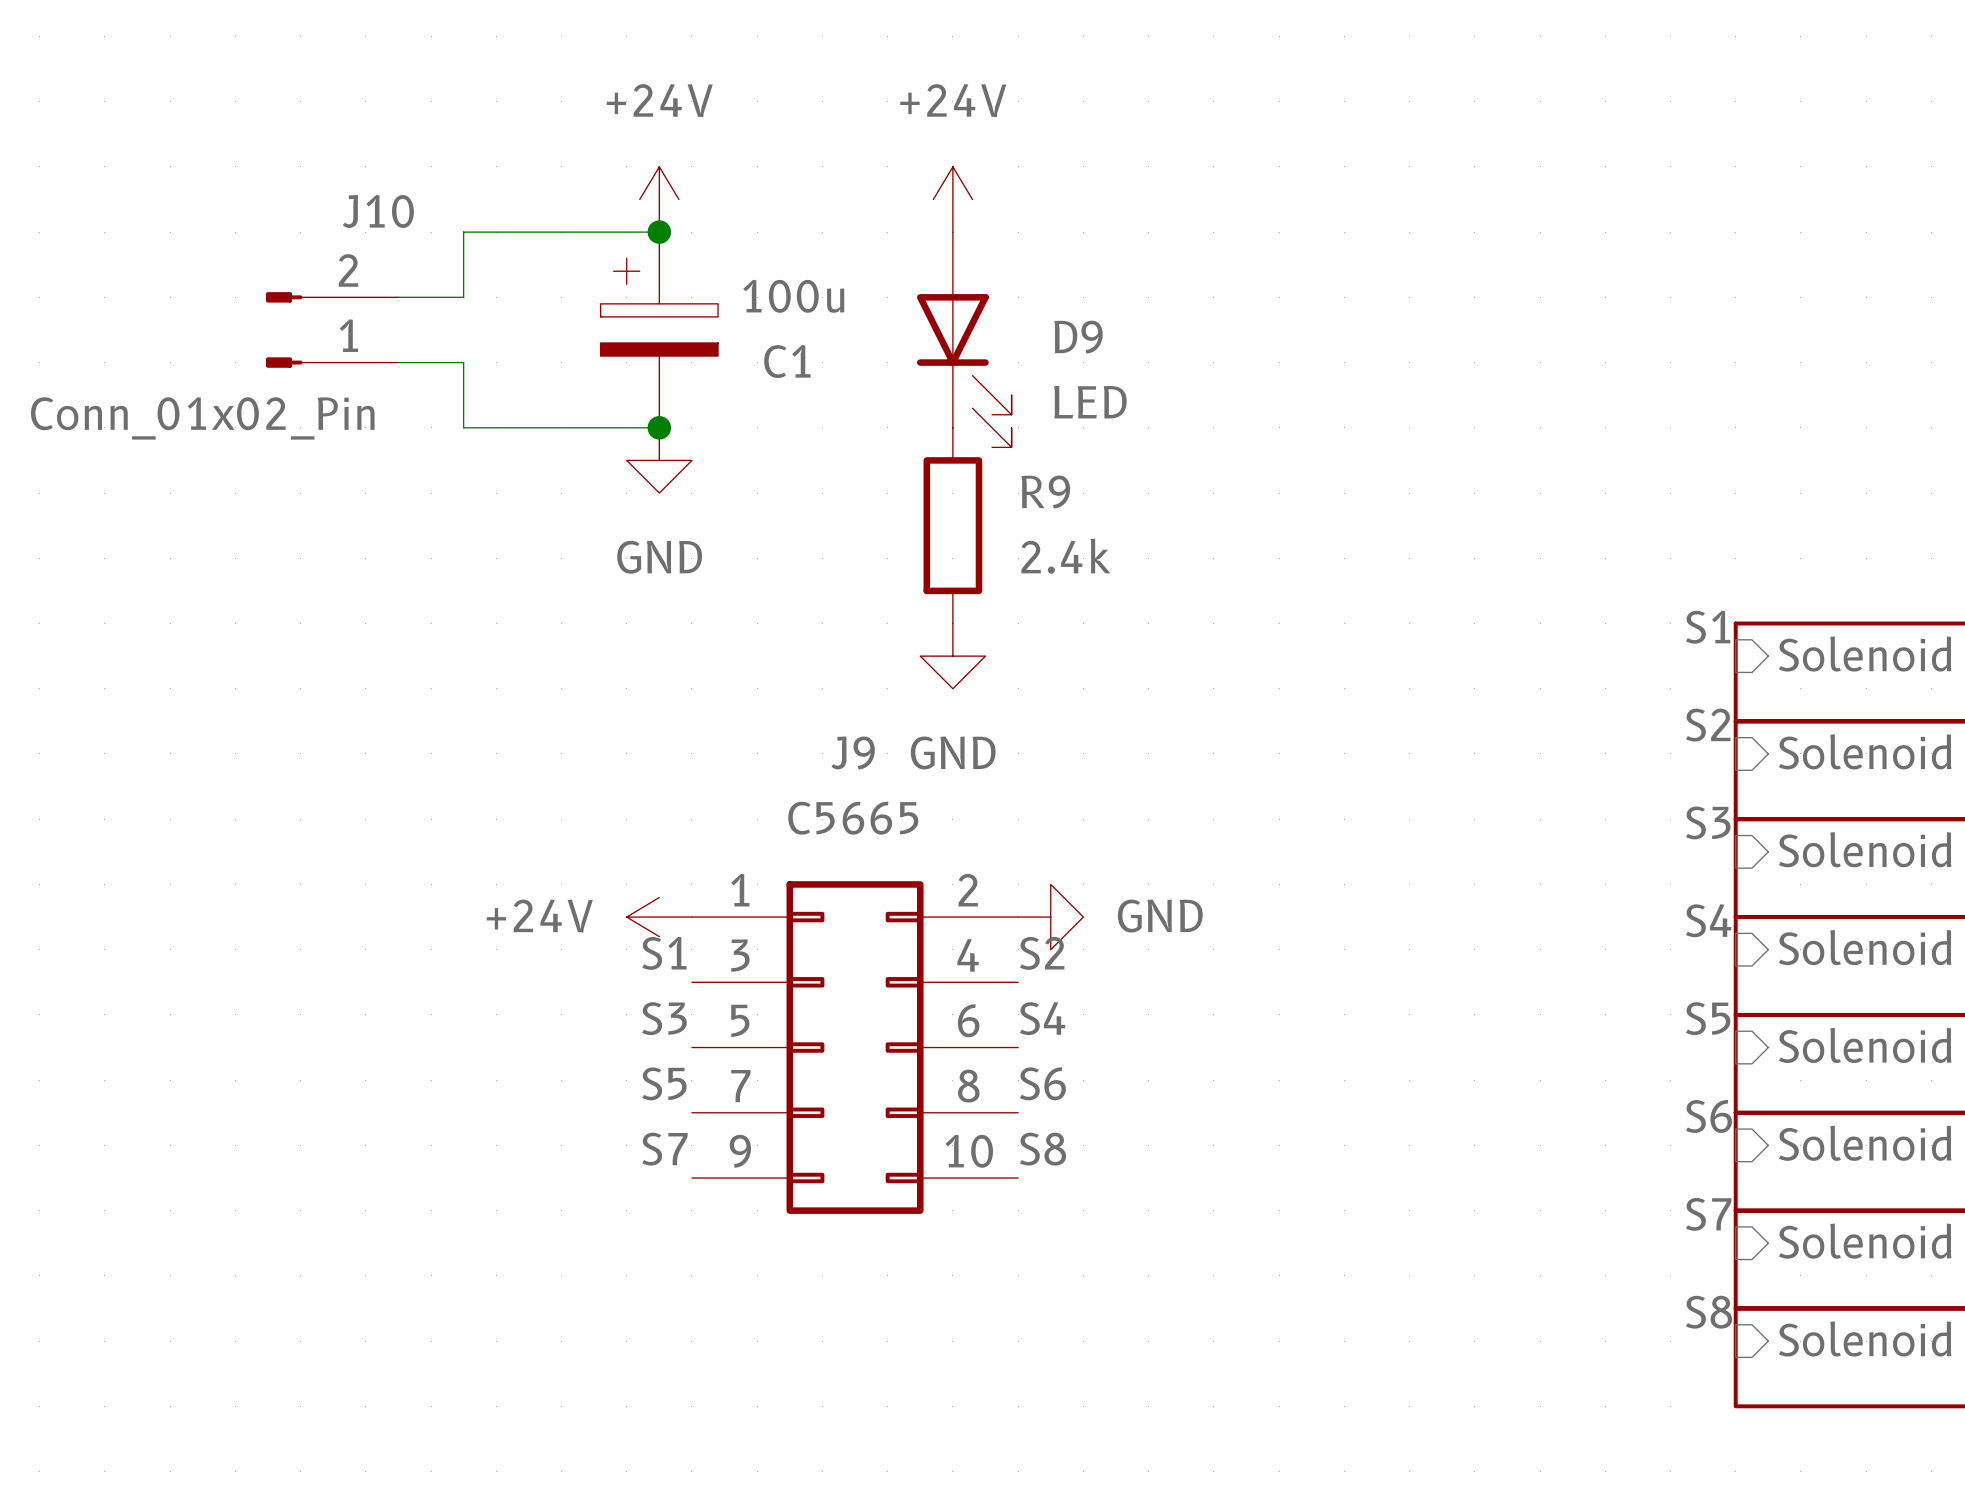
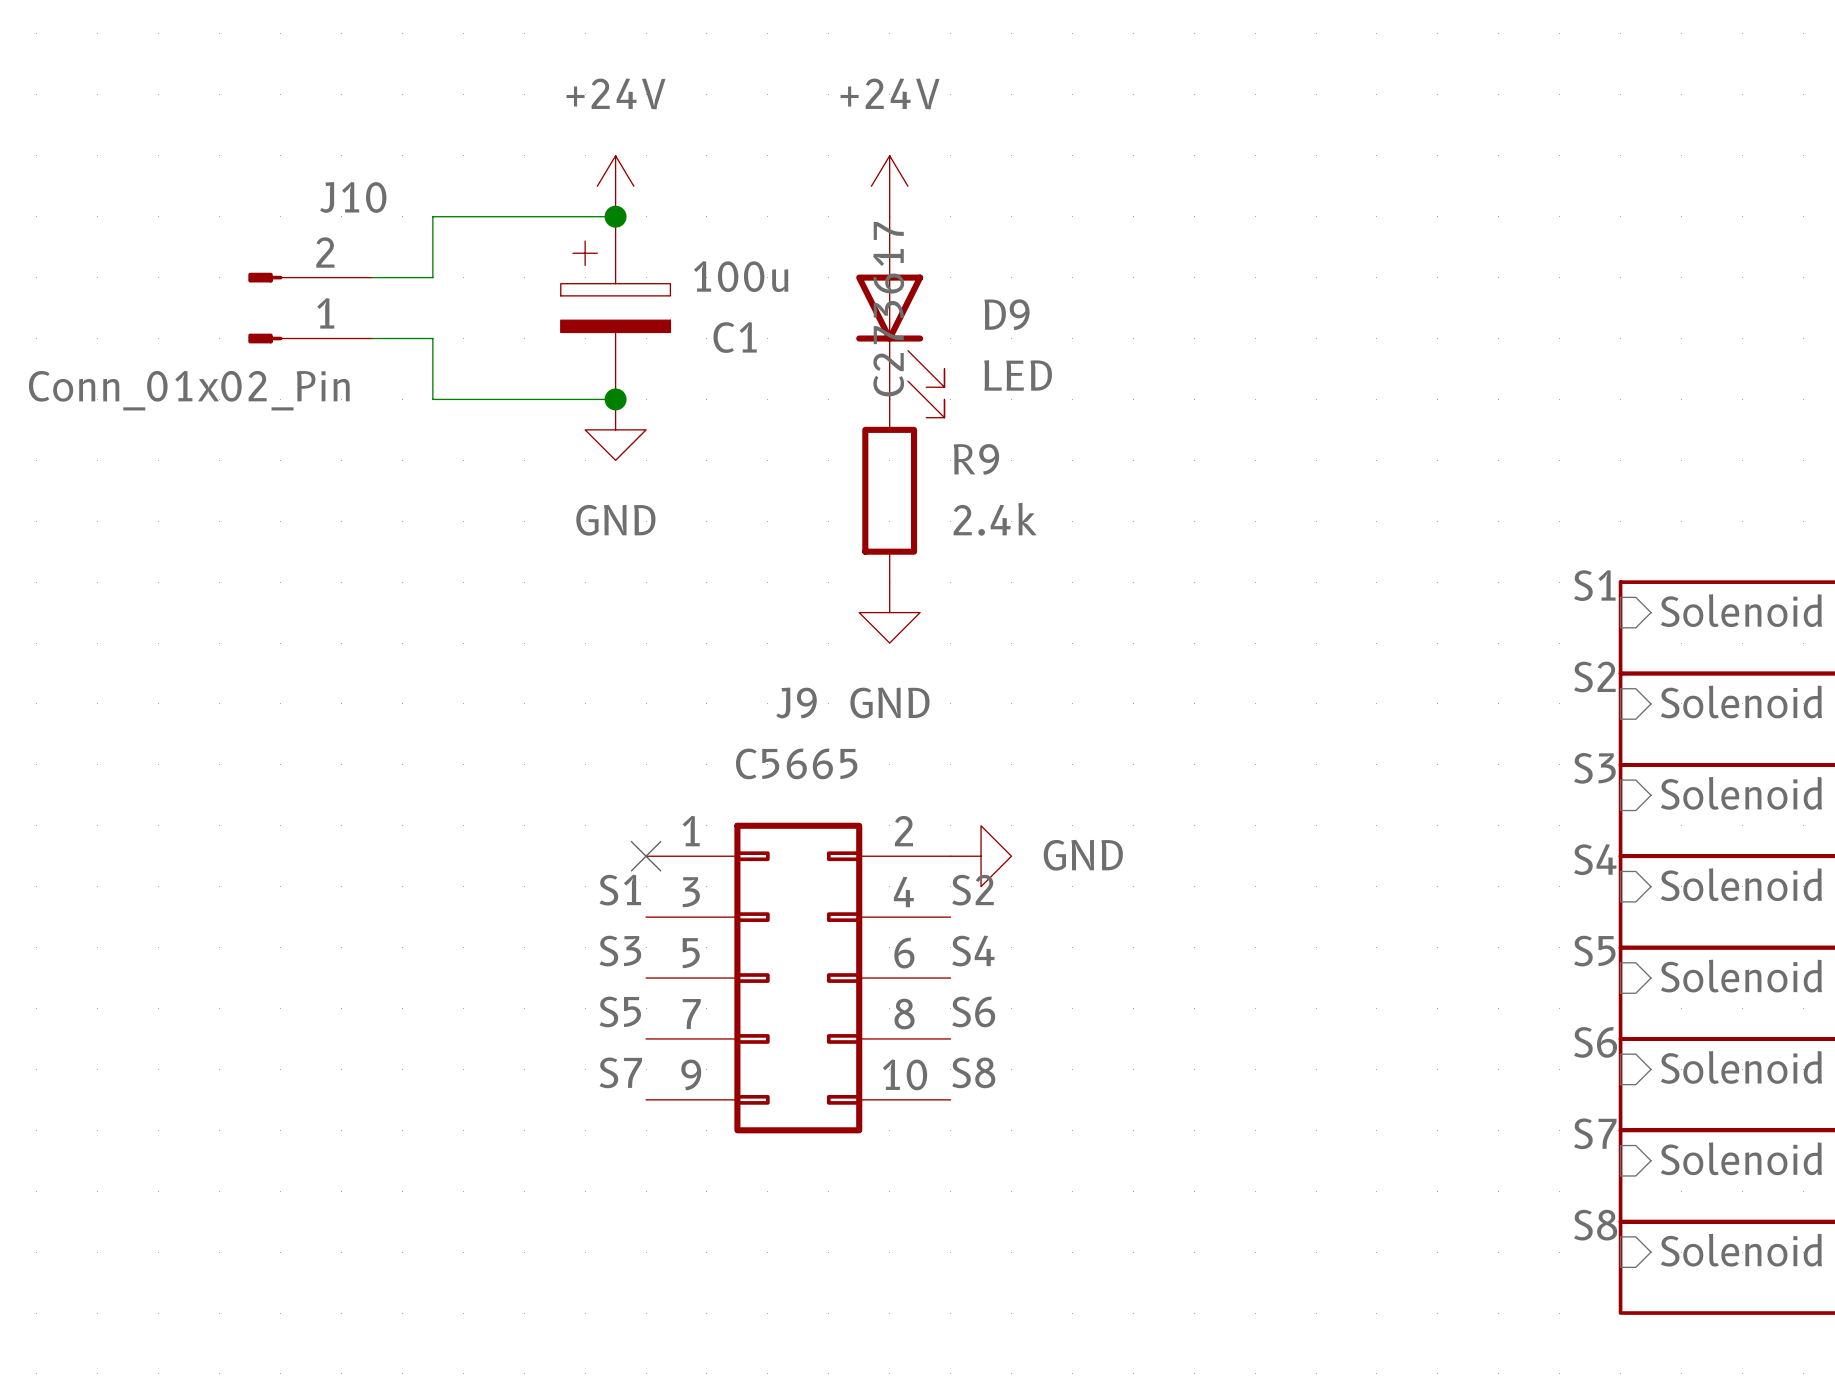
D9 text: none -> C273617 (888, 309)
power symbol: +24V (659, 917) -> none
no-connect mark: none -> (646, 856)

